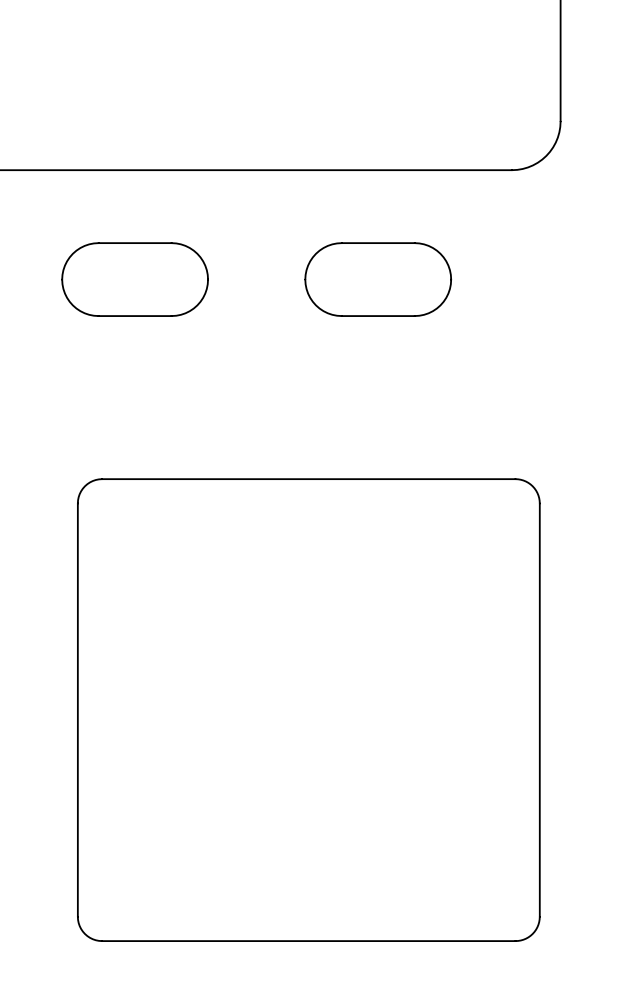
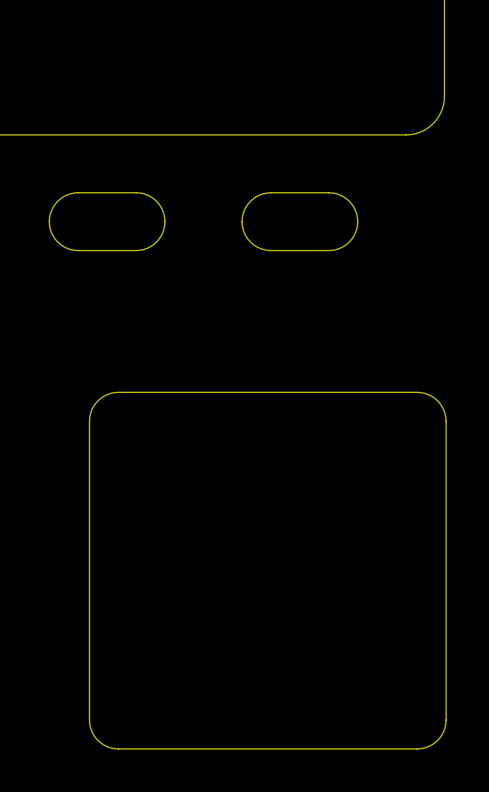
board edge: (102, 479) (515, 479) (526, 481) (532, 486) (537, 492) (539, 503) (539, 916) (537, 927) (532, 933) (523, 939) (515, 941) (102, 941) (92, 939) (84, 933) (79, 926) (77, 916) (77, 503) (79, 494) (84, 486) (92, 481) (102, 479) -> (118, 392) (107, 394) (97, 400) (91, 410) (89, 421) (89, 720) (91, 731) (97, 740) (107, 746) (118, 748) (417, 748) (428, 746) (437, 740) (443, 731) (446, 720) (446, 421) (443, 410) (437, 400) (428, 394) (417, 392) (118, 392)

